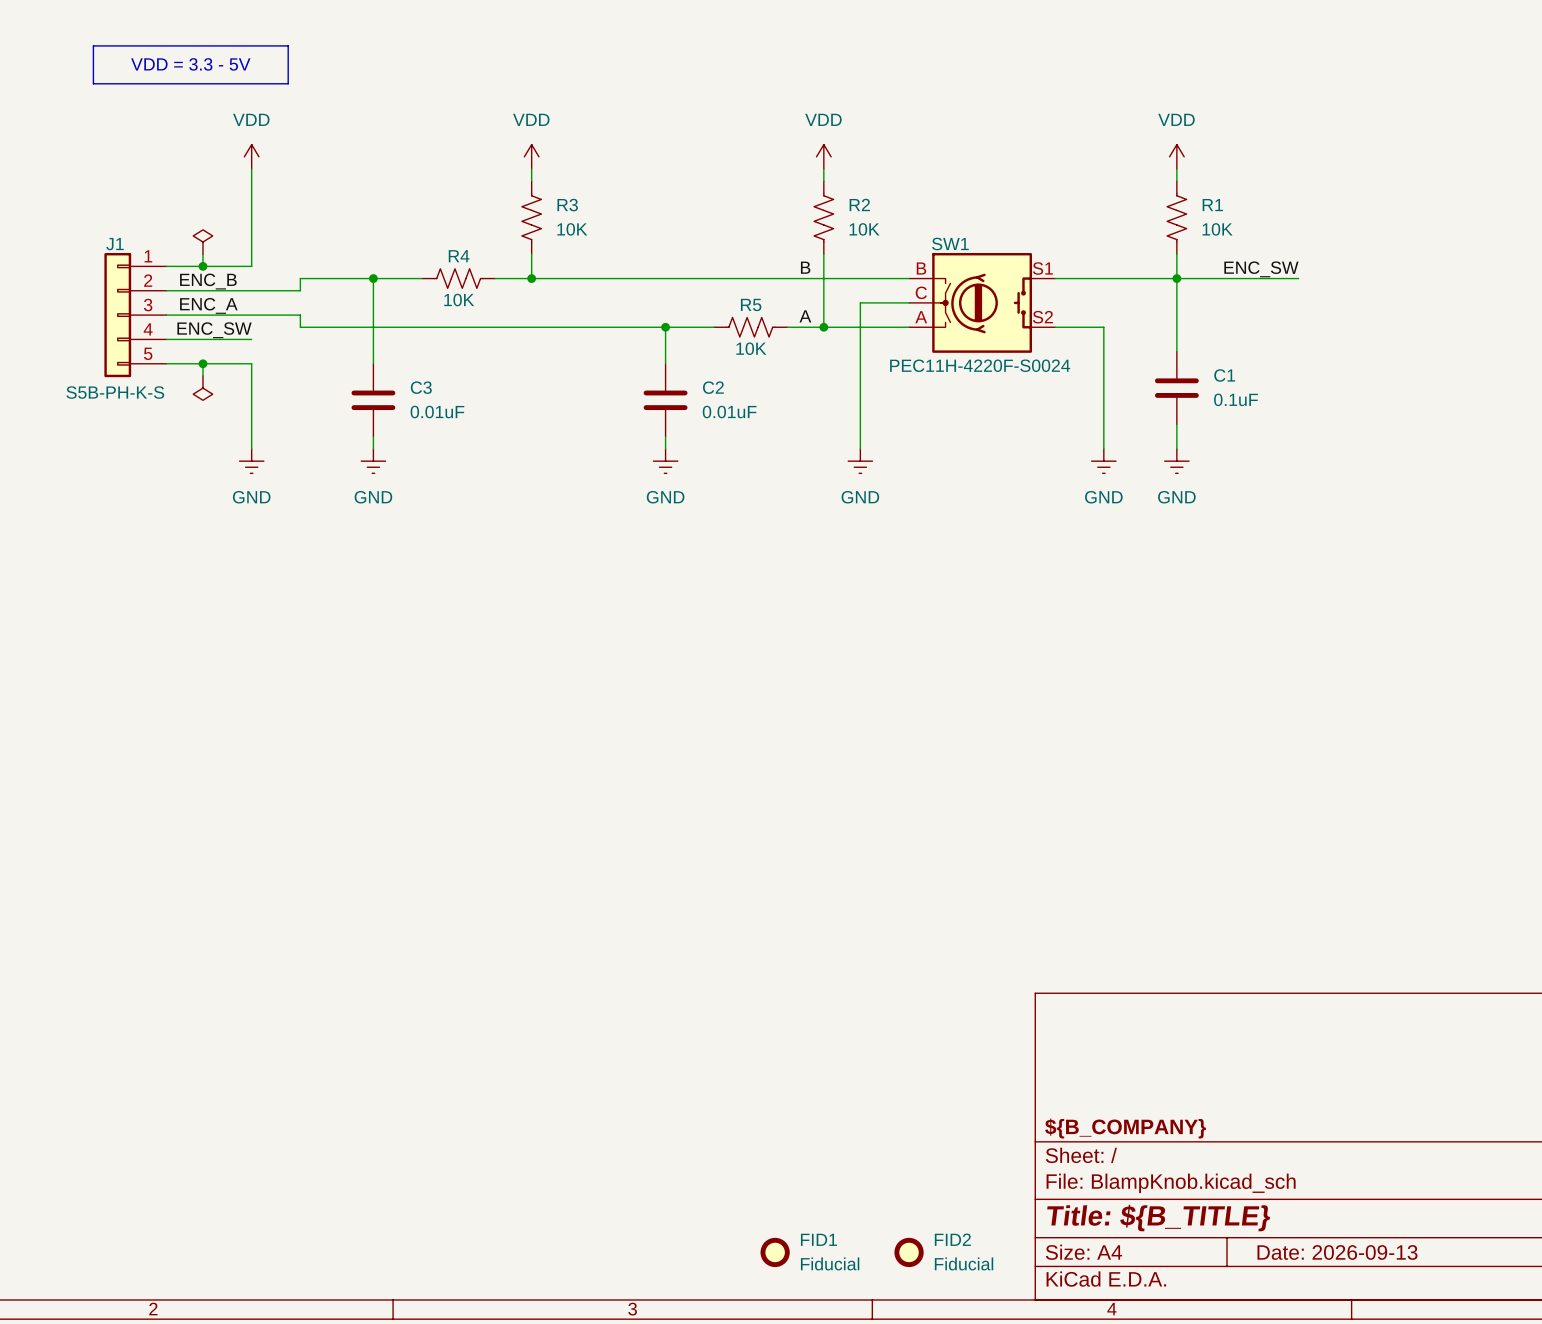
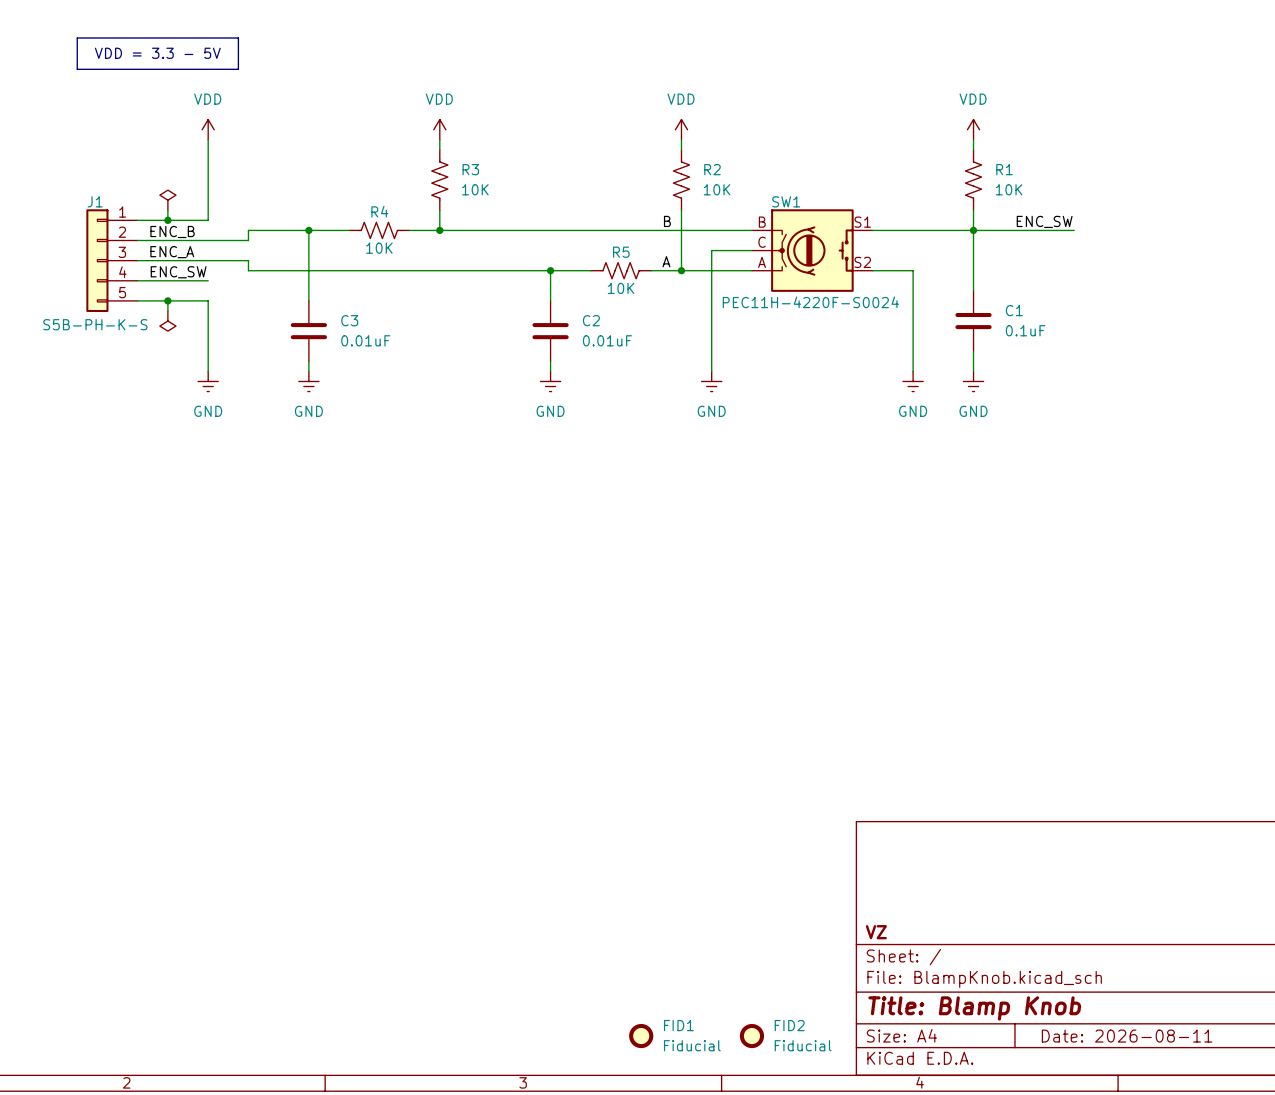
title block: ${B_COMPANY} (1125, 1128) -> VZ (876, 932)
title block: Title: ${B_TITLE} (1158, 1218) -> Title: Blamp Knob (974, 1008)
title block: Date: 2026-09-13 (1337, 1252) -> Date: 2026-08-11 (1127, 1036)

